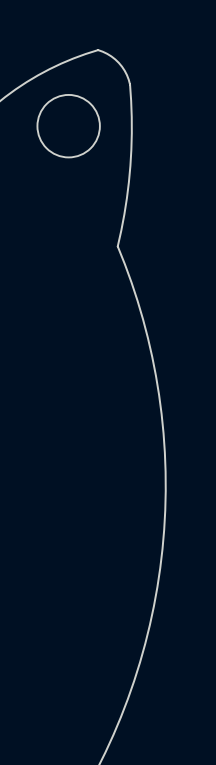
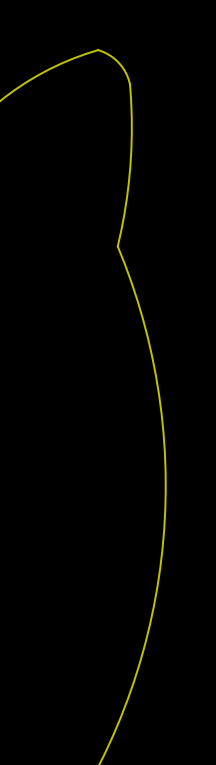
round board edge: [36, 94, 101, 158] -> none

